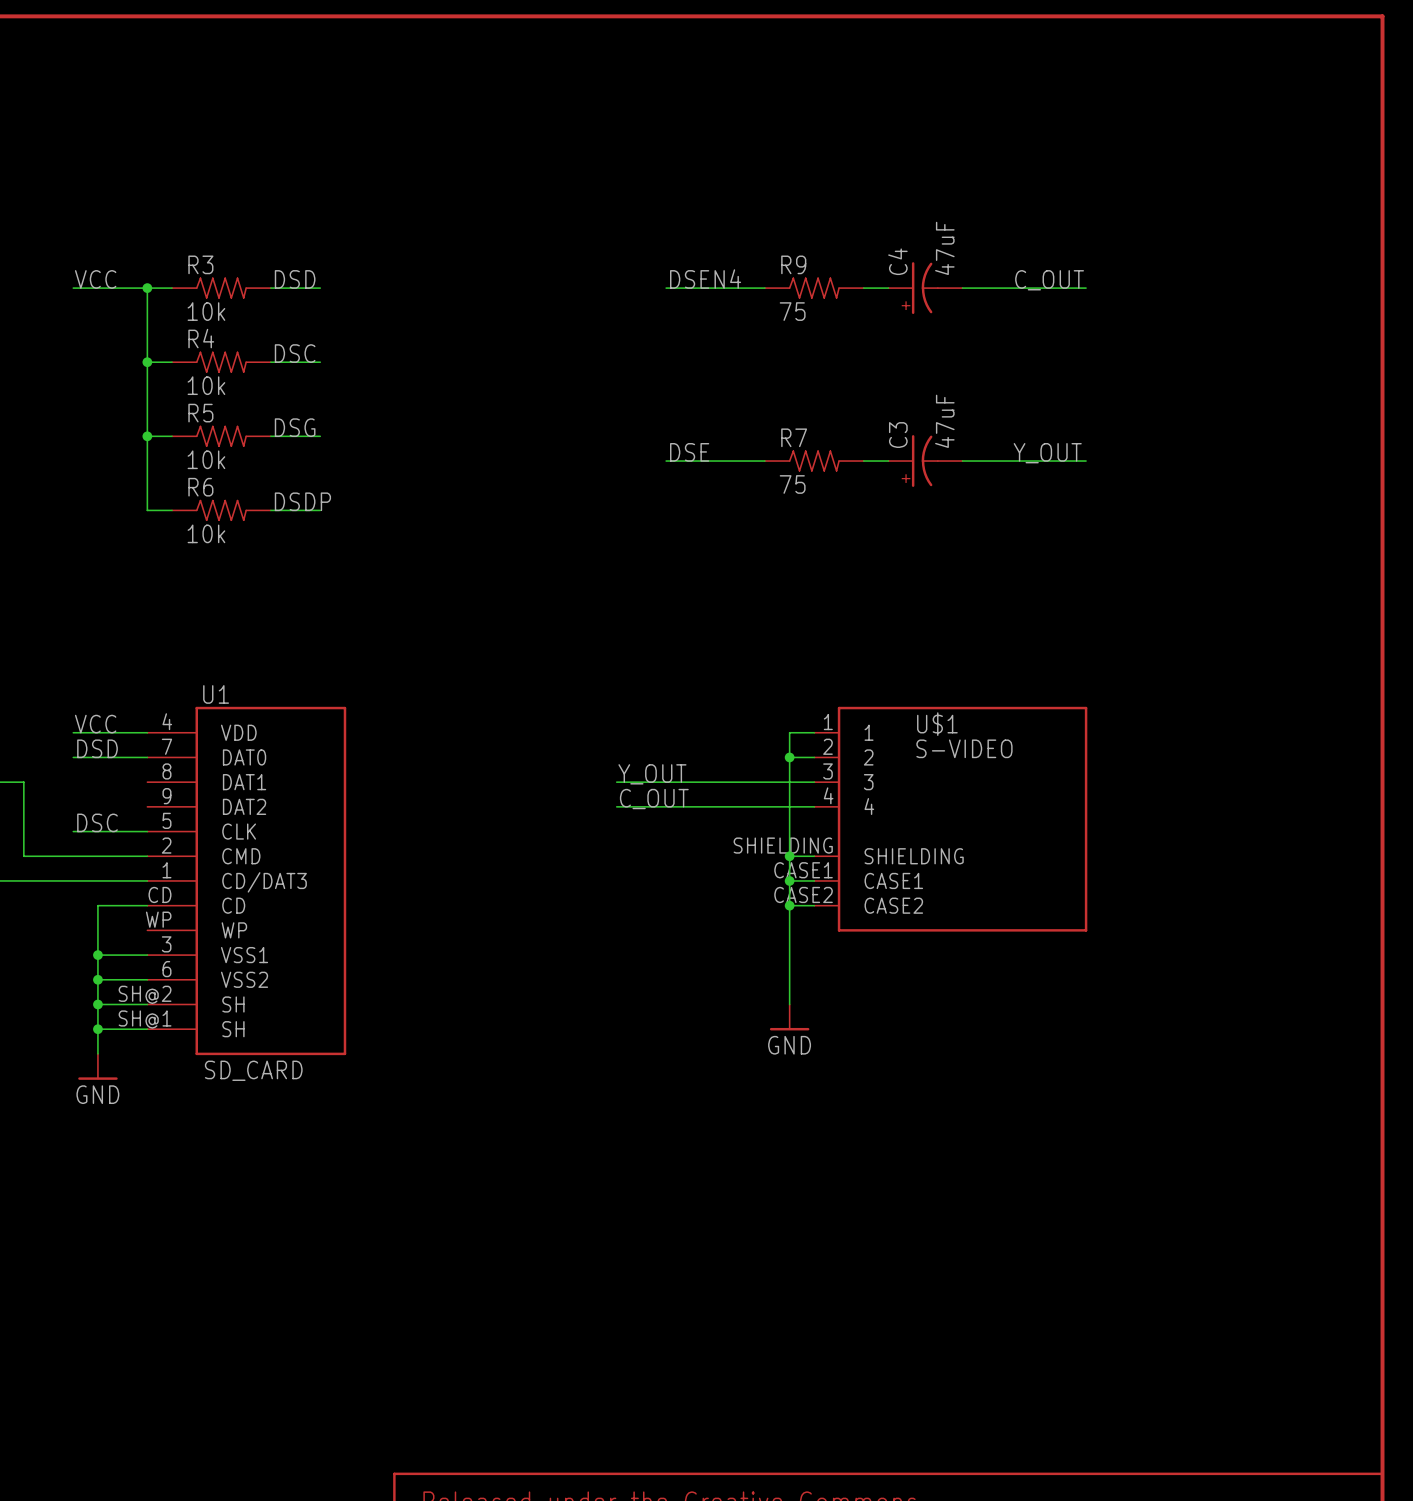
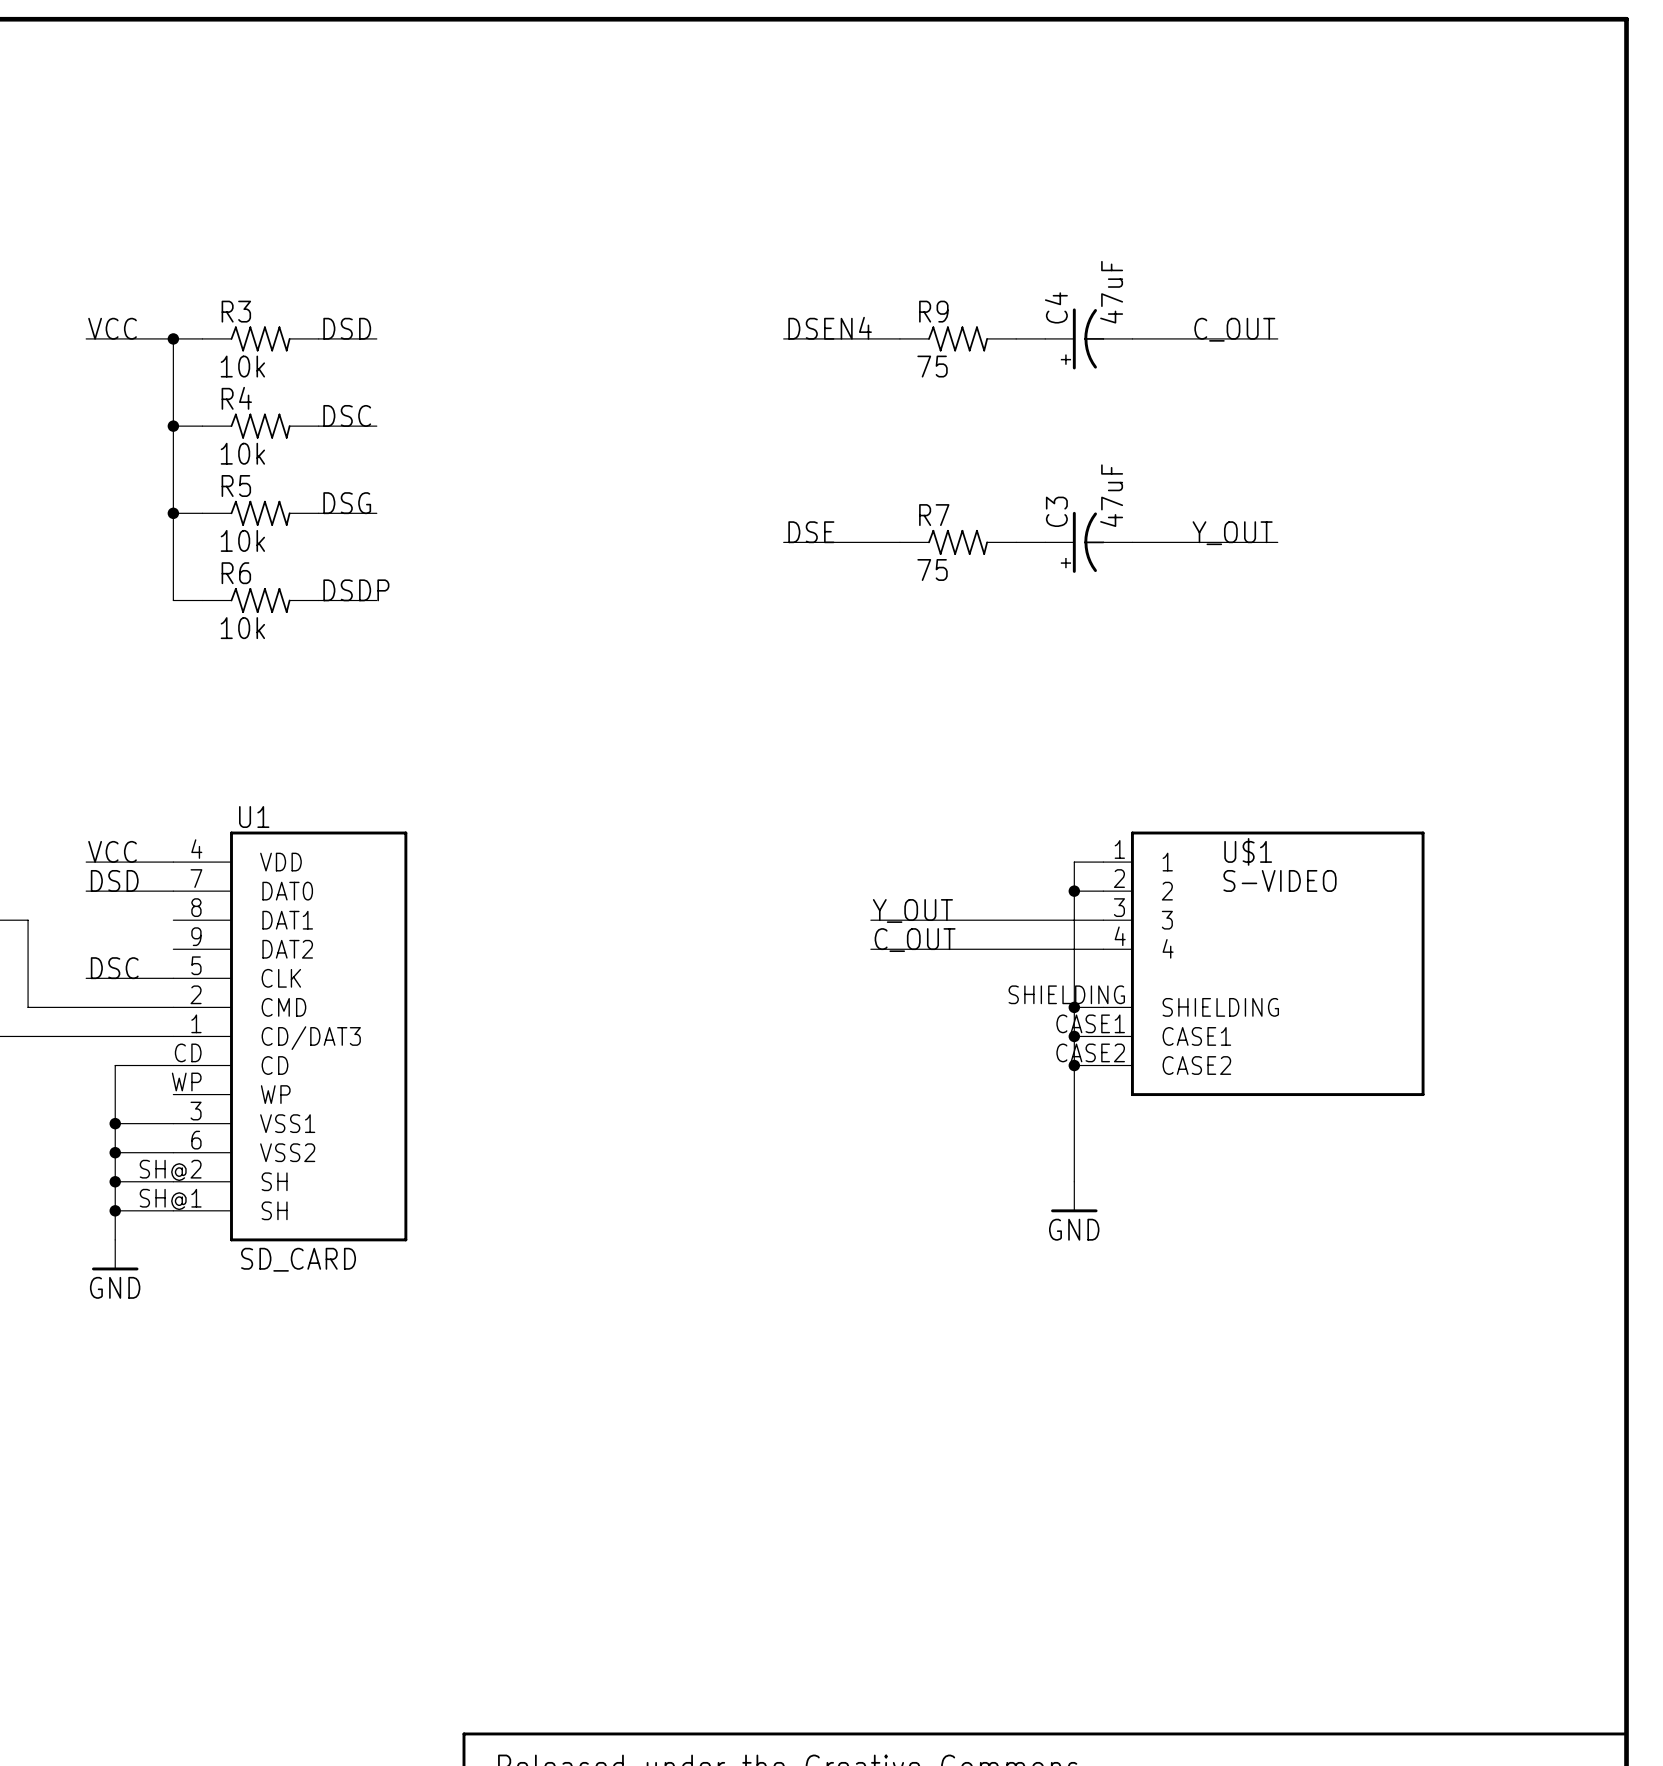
wire: (814, 732) (789, 732) (789, 1004) -> (1103, 862) (1074, 862) (1074, 1181)
wire: (789, 757) (814, 757) -> (1074, 891) (1103, 891)
junction: (789, 757) -> none
junction: none -> (1074, 891)
label position: Y_OUT (652, 774) -> Y_OUT (912, 910)
wire: (616, 782) (740, 782) -> (958, 920) (1103, 920)
label position: C_OUT (654, 799) -> C_OUT (915, 940)
wire: (616, 806) (740, 806) -> (958, 949) (1103, 949)
U$1 position: (950, 819) -> (1263, 963)
wire: (789, 856) (814, 856) -> (1074, 1007) (1103, 1007)
junction: (789, 856) -> none
junction: none -> (1074, 1007)
wire: (789, 880) (814, 880) -> (1074, 1036) (1103, 1036)
junction: (789, 880) -> none
junction: none -> (1074, 1036)
wire: (789, 905) (814, 905) -> (1074, 1065) (1103, 1065)
junction: (789, 905) -> none
junction: none -> (1074, 1065)
power symbol position: GND (789, 1017) -> GND (1074, 1197)

